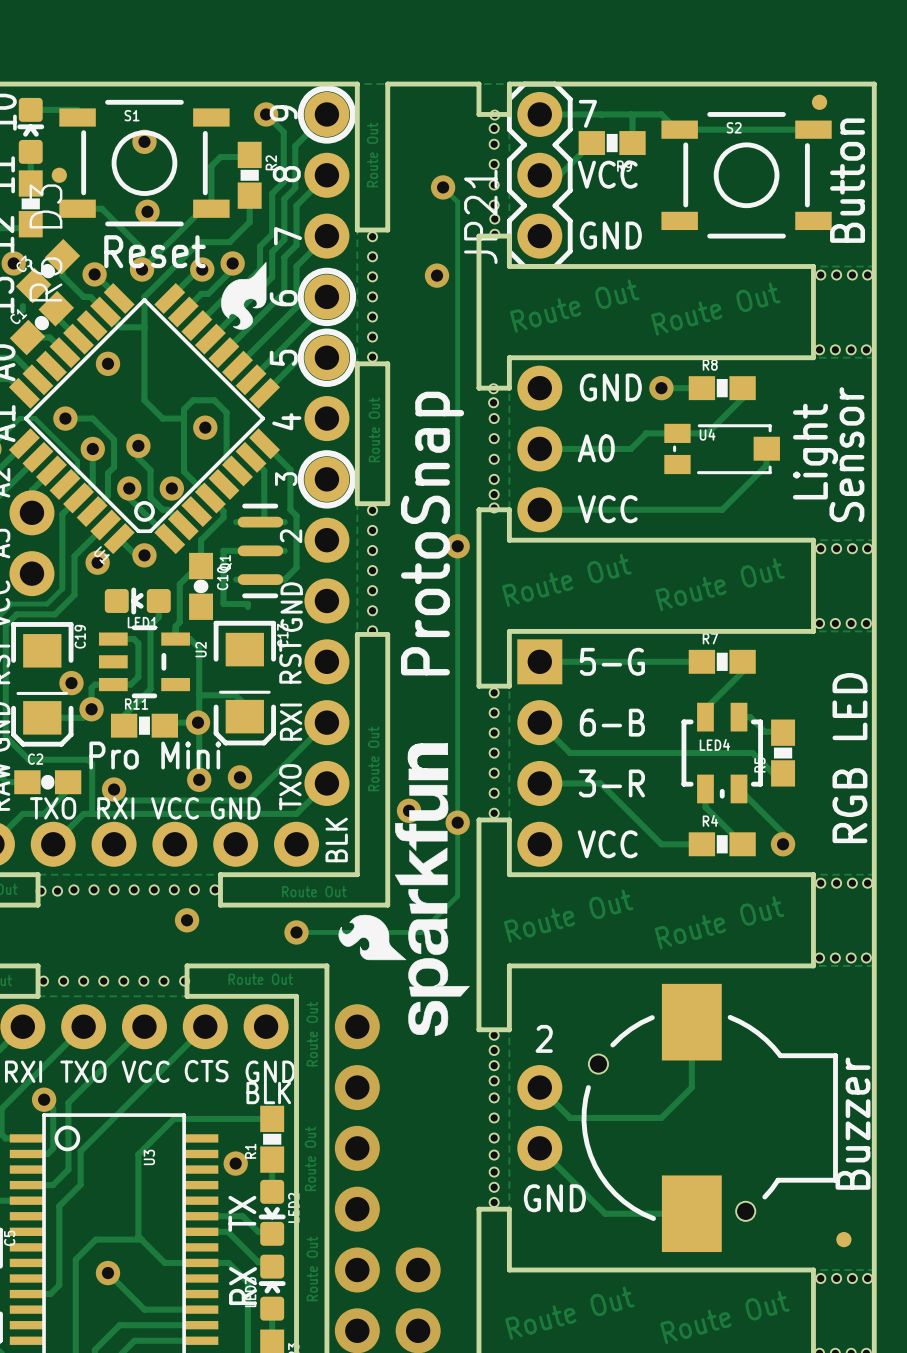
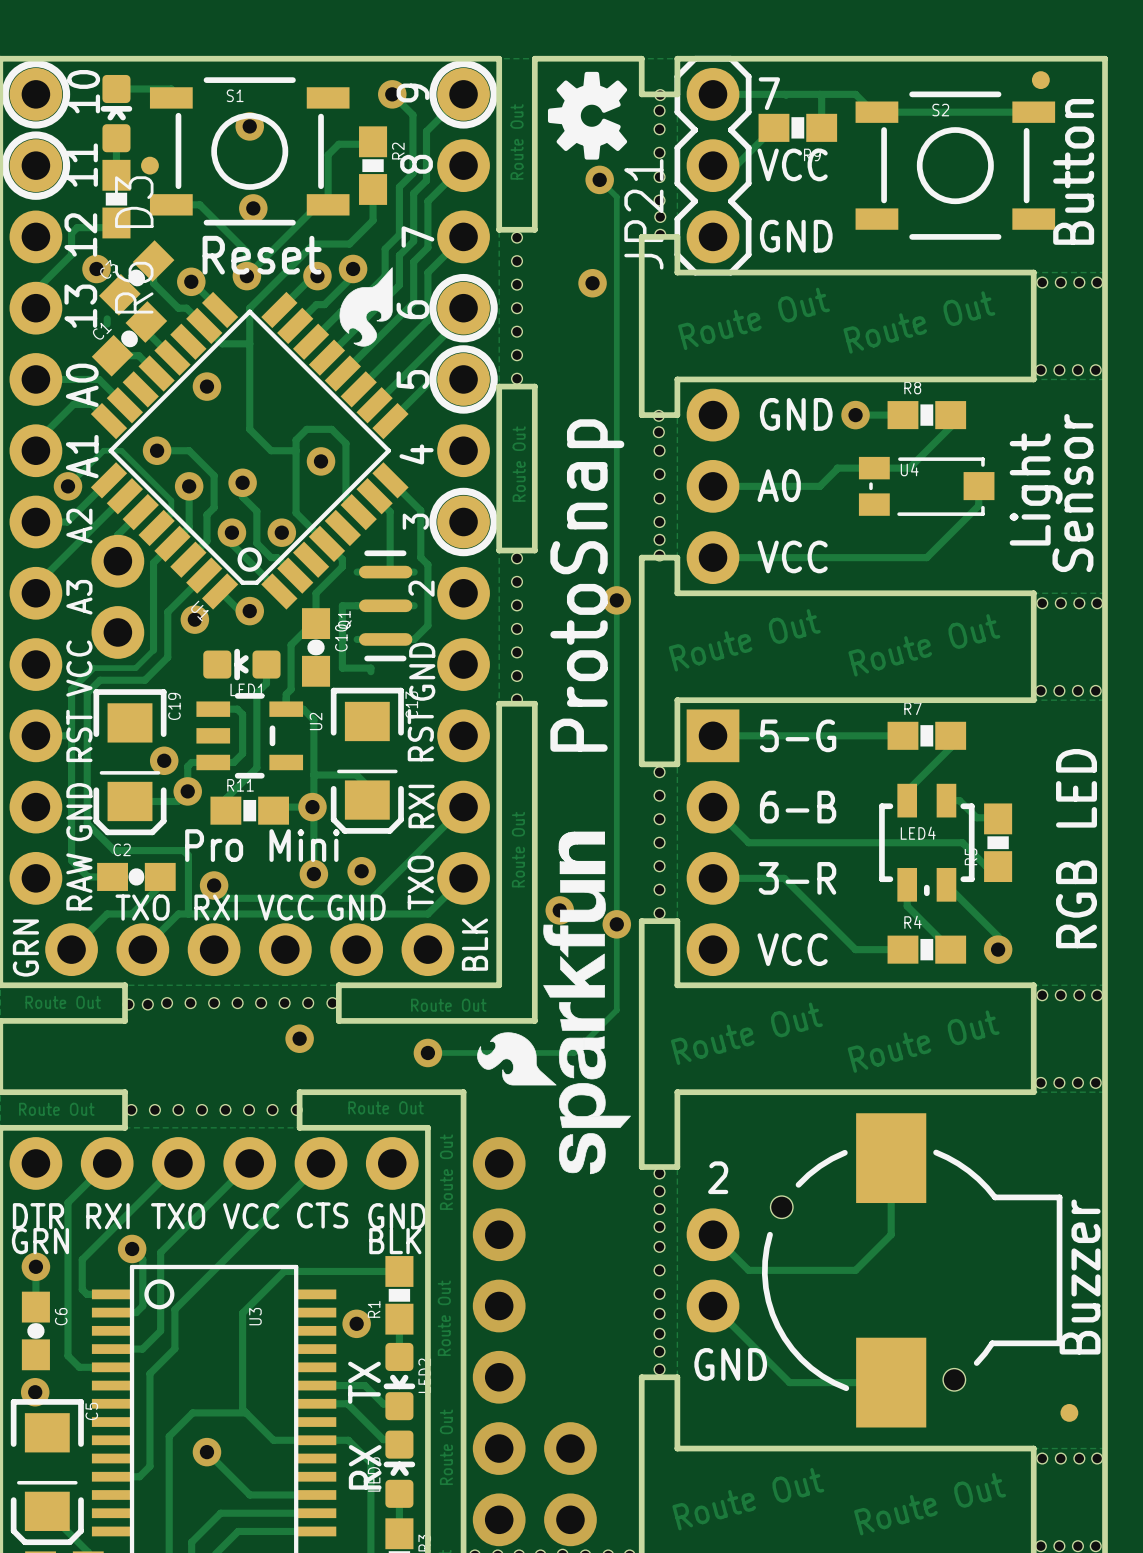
drawing: none -> [547, 71, 628, 160]

